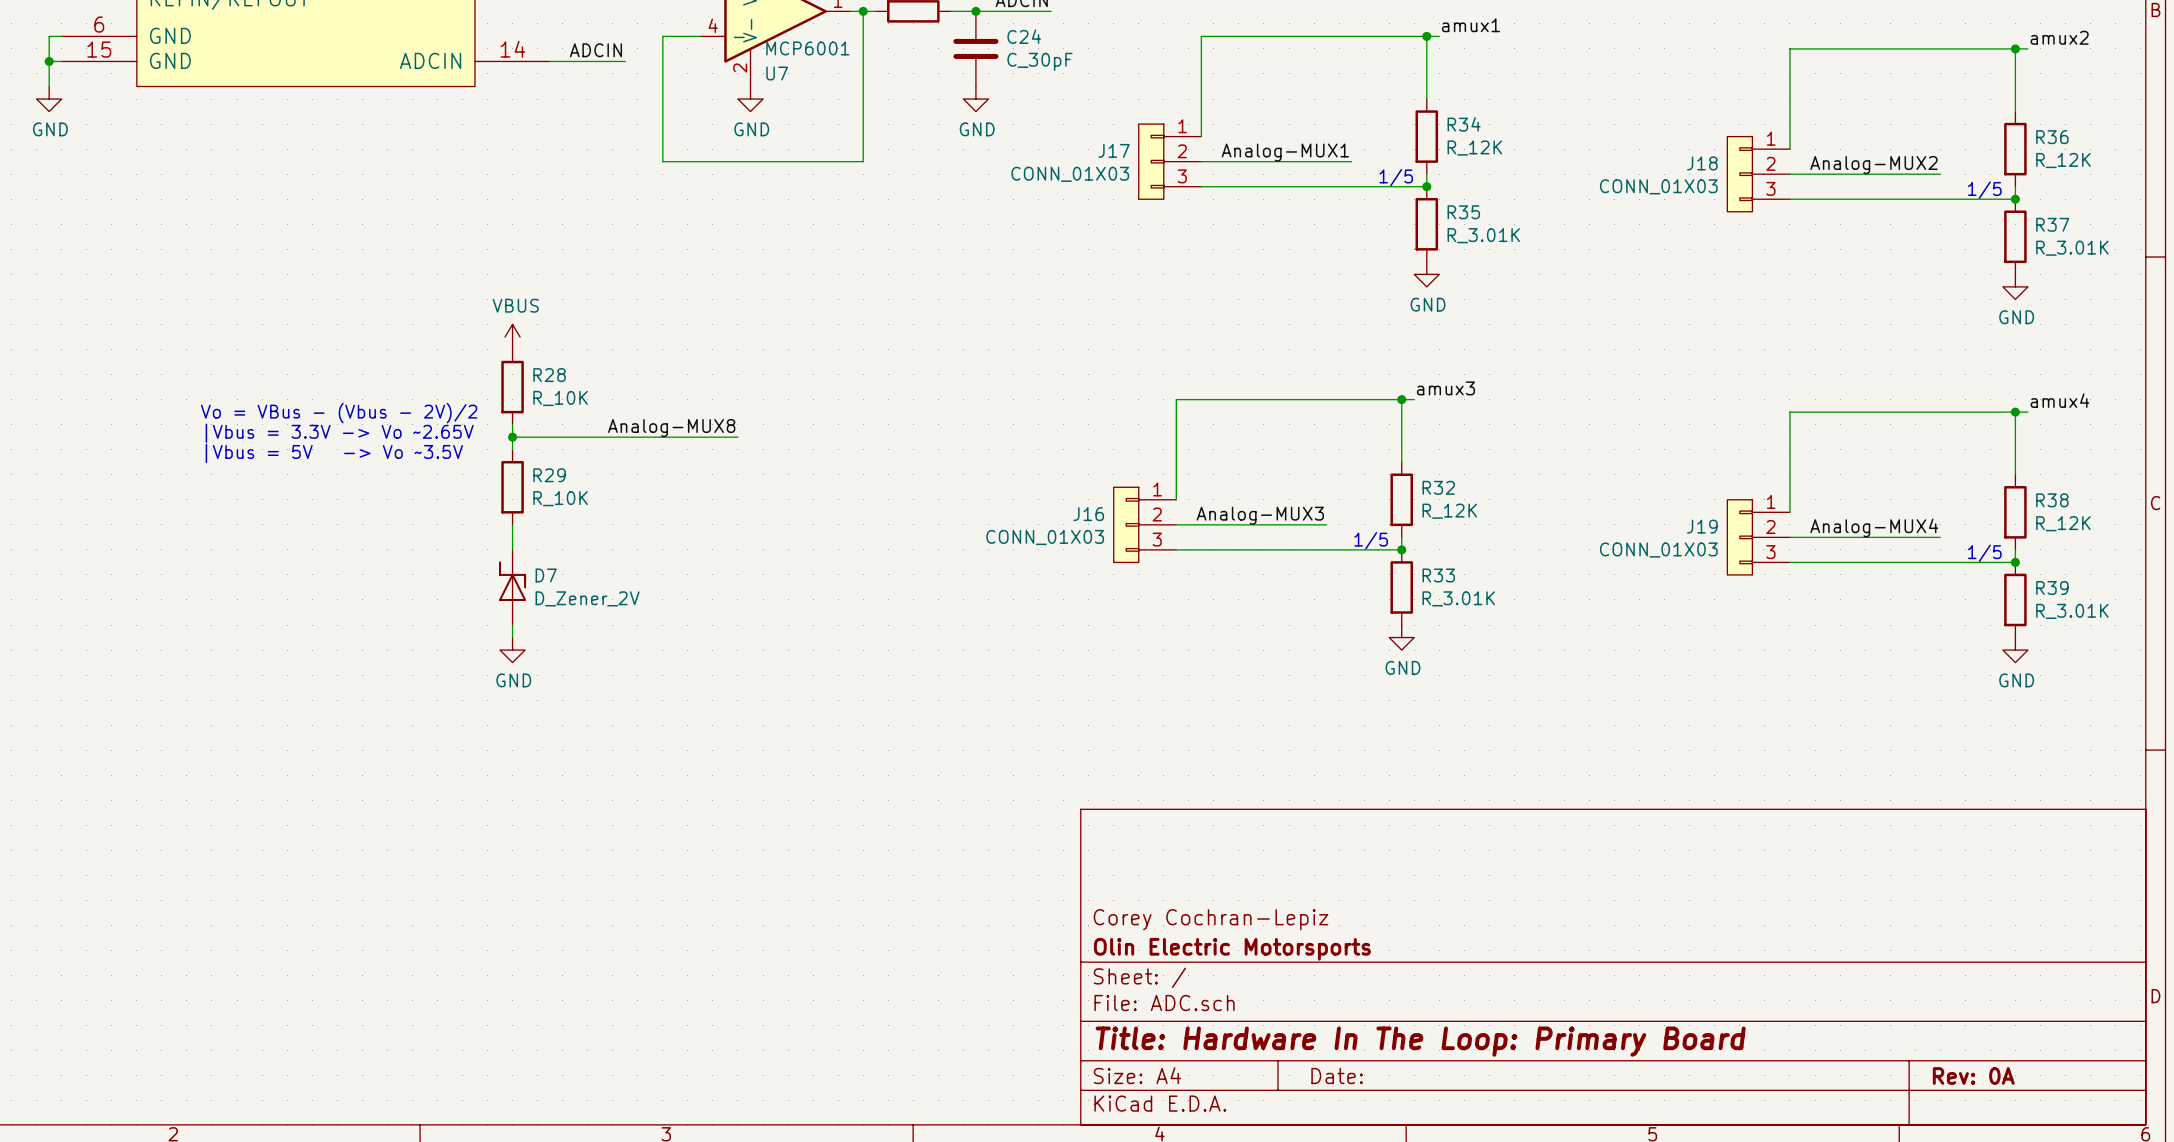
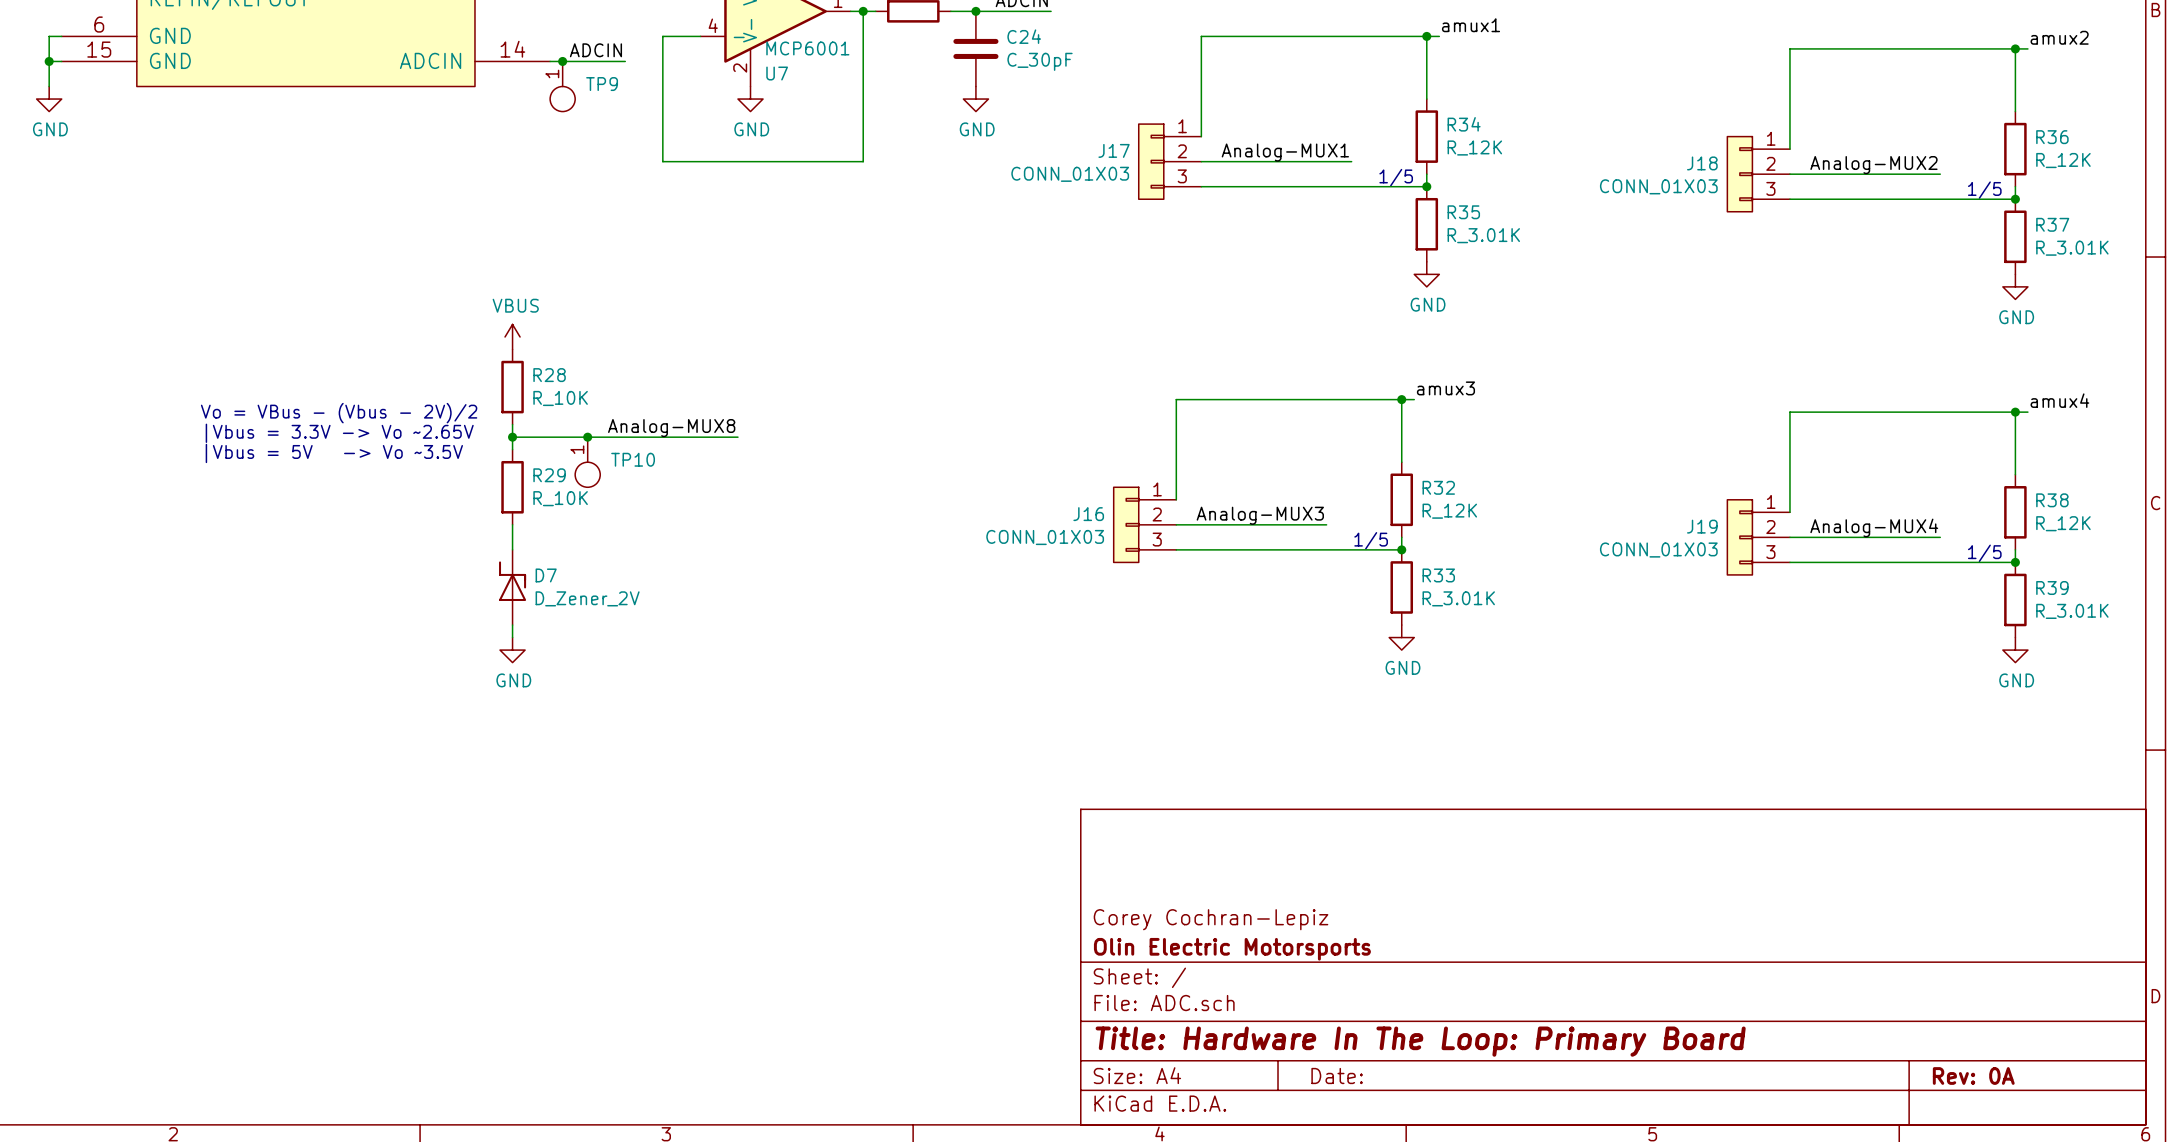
junction: none -> (562, 61)
TP9: none -> (562, 86)
junction: none -> (587, 437)
TP10: none -> (587, 462)

